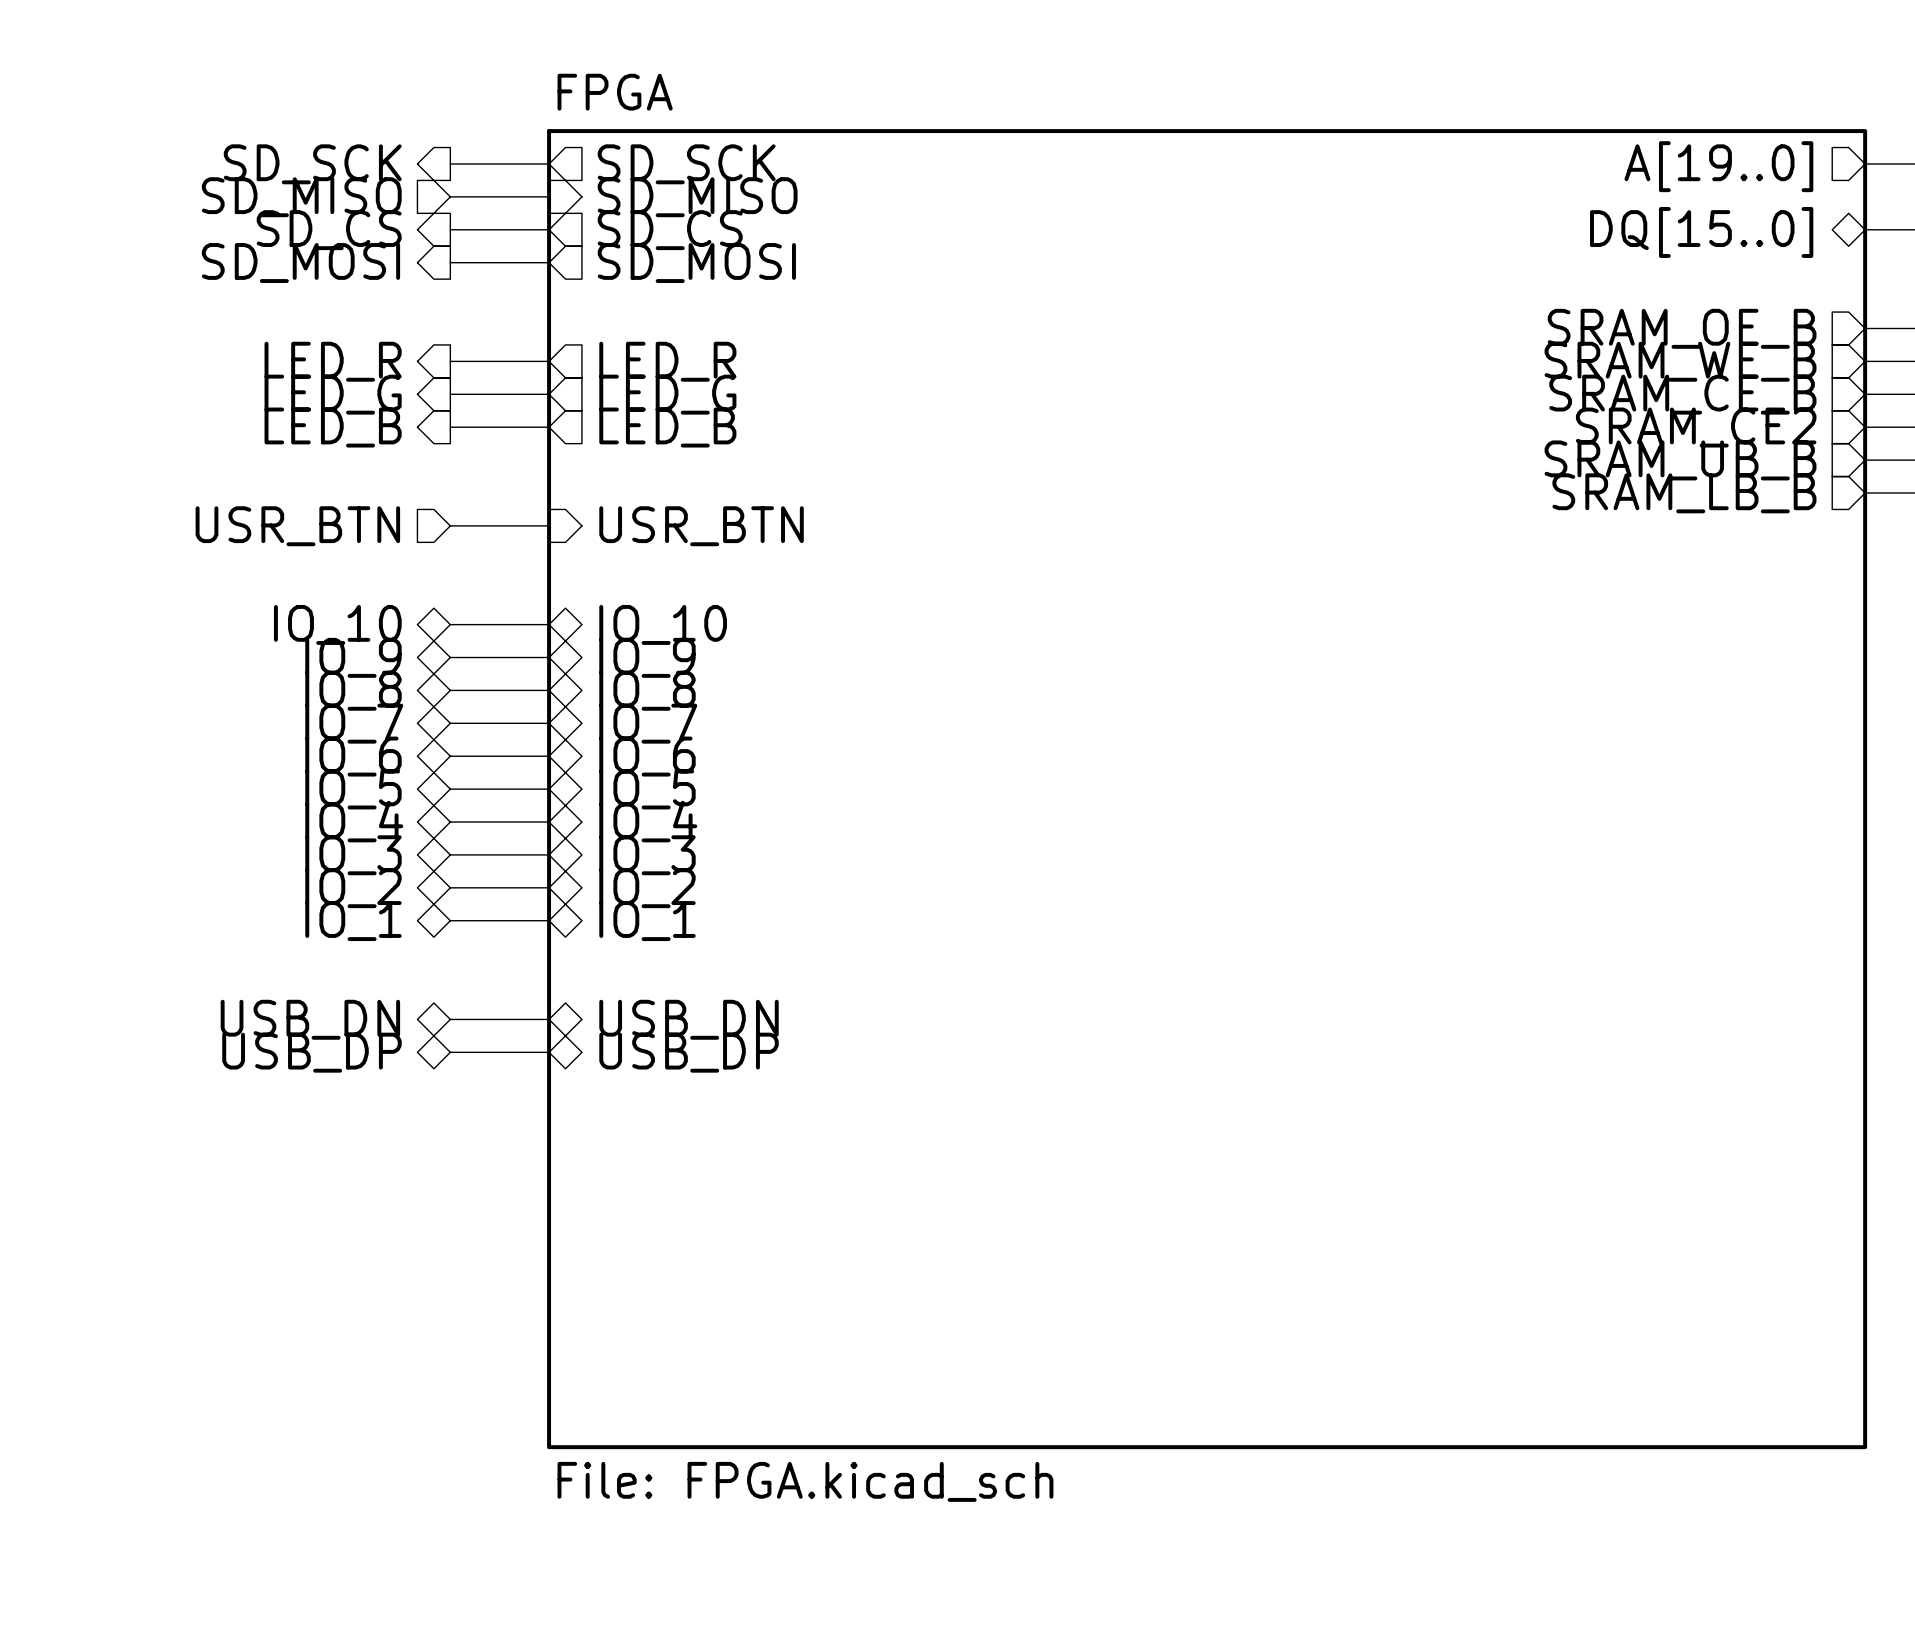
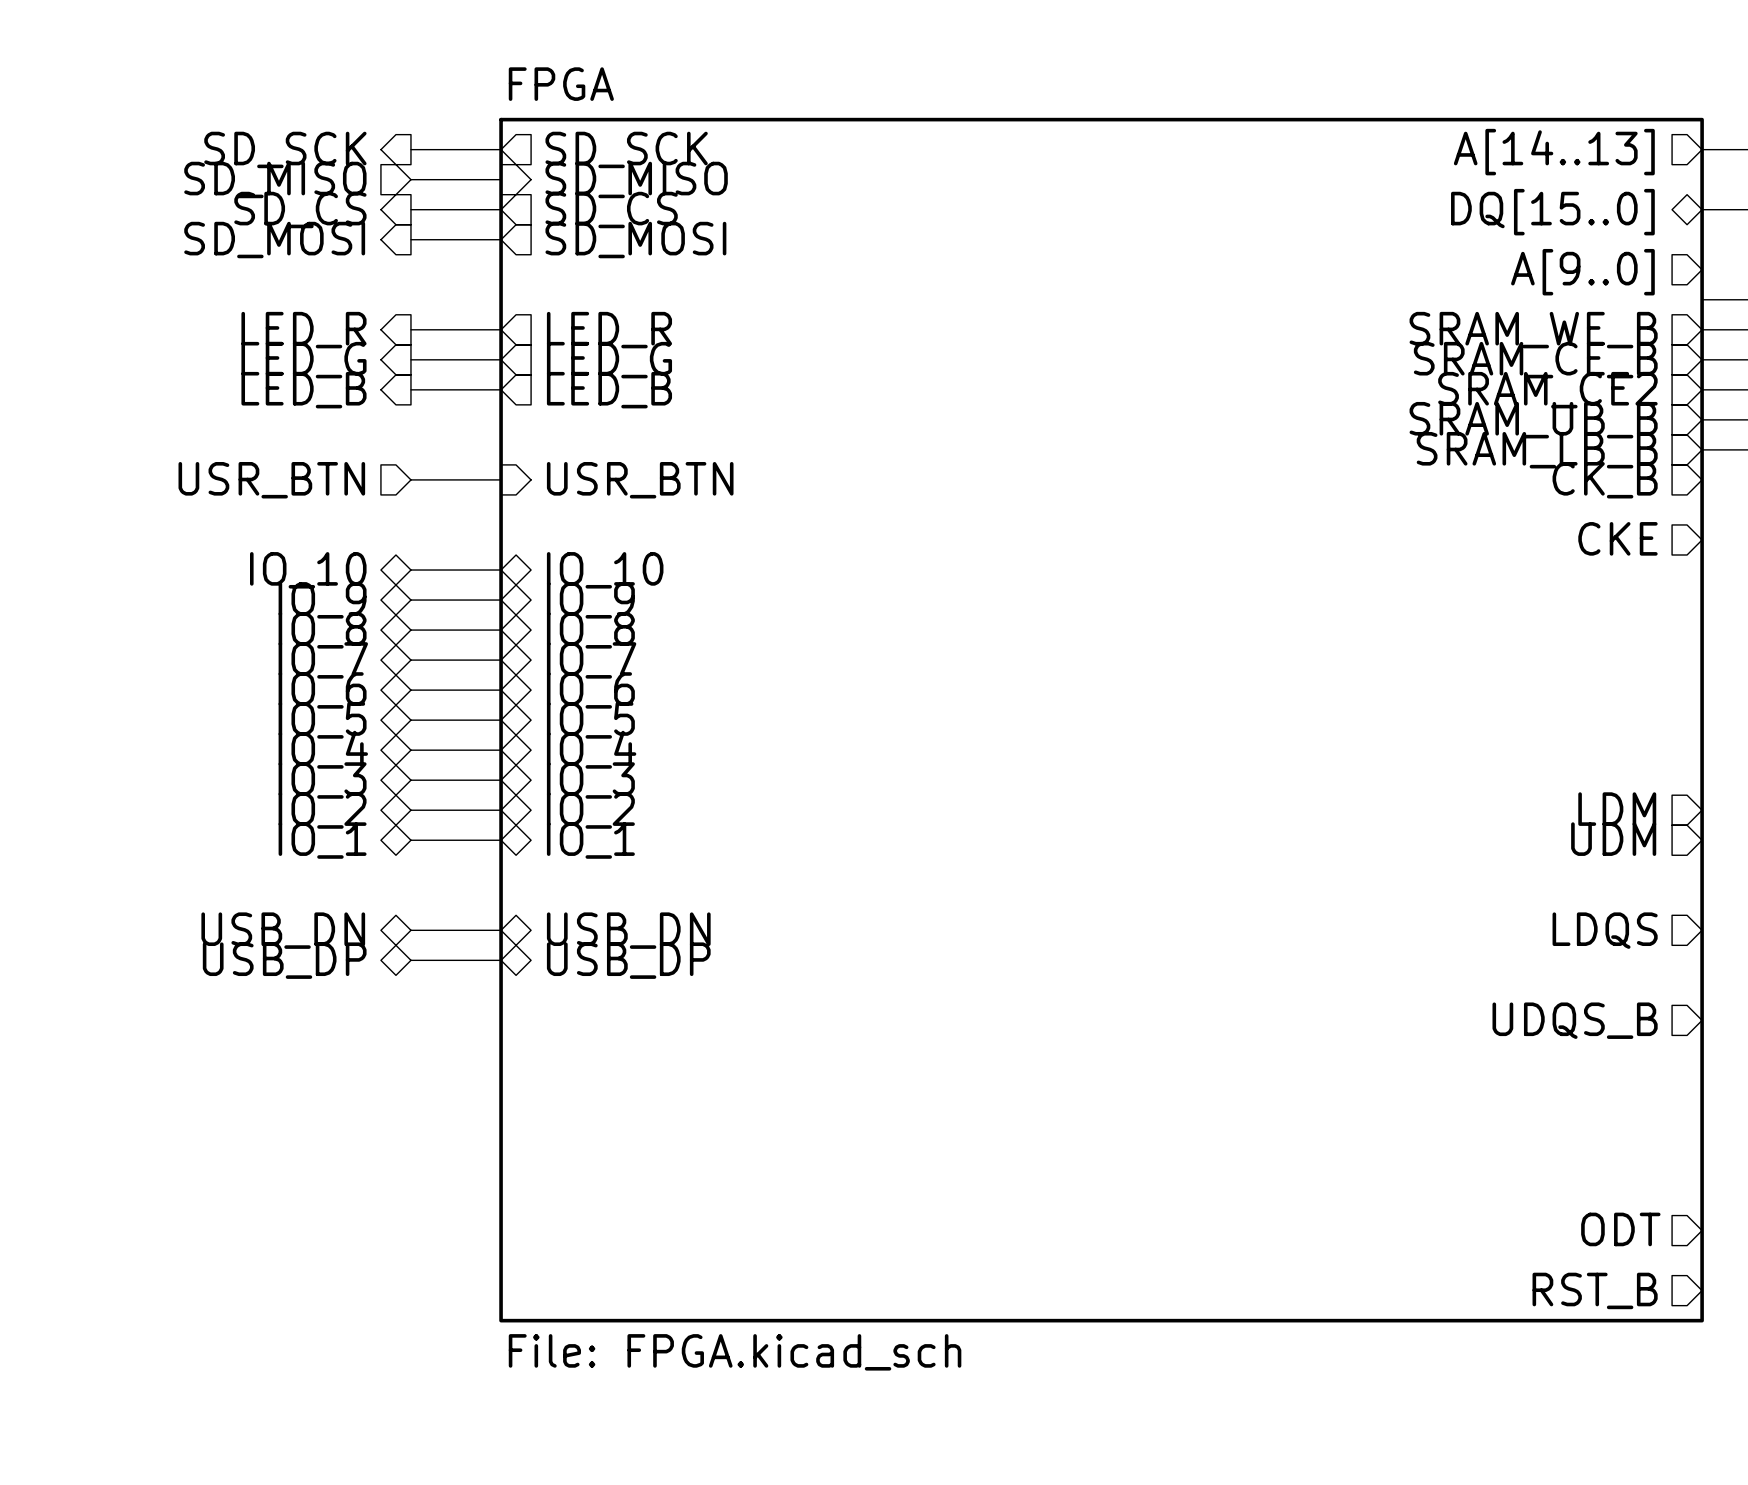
sheet pin: A[19..0] (1718, 166) -> A[14..13] (1554, 152)
sheet pin: none -> A[9..0] (1582, 272)
sheet pin: SRAM_OE_B (1682, 328) -> none
sheet pin: none -> CK_B (1605, 480)
sheet pin: none -> CKE (1617, 538)
sheet pin: none -> LDM (1617, 809)
sheet pin: none -> UDM (1613, 839)
sheet pin: none -> LDQS (1605, 930)
sheet pin: none -> UDQS_B (1575, 1020)
sheet pin: none -> ODT (1620, 1229)
sheet pin: none -> RST_B (1595, 1290)

